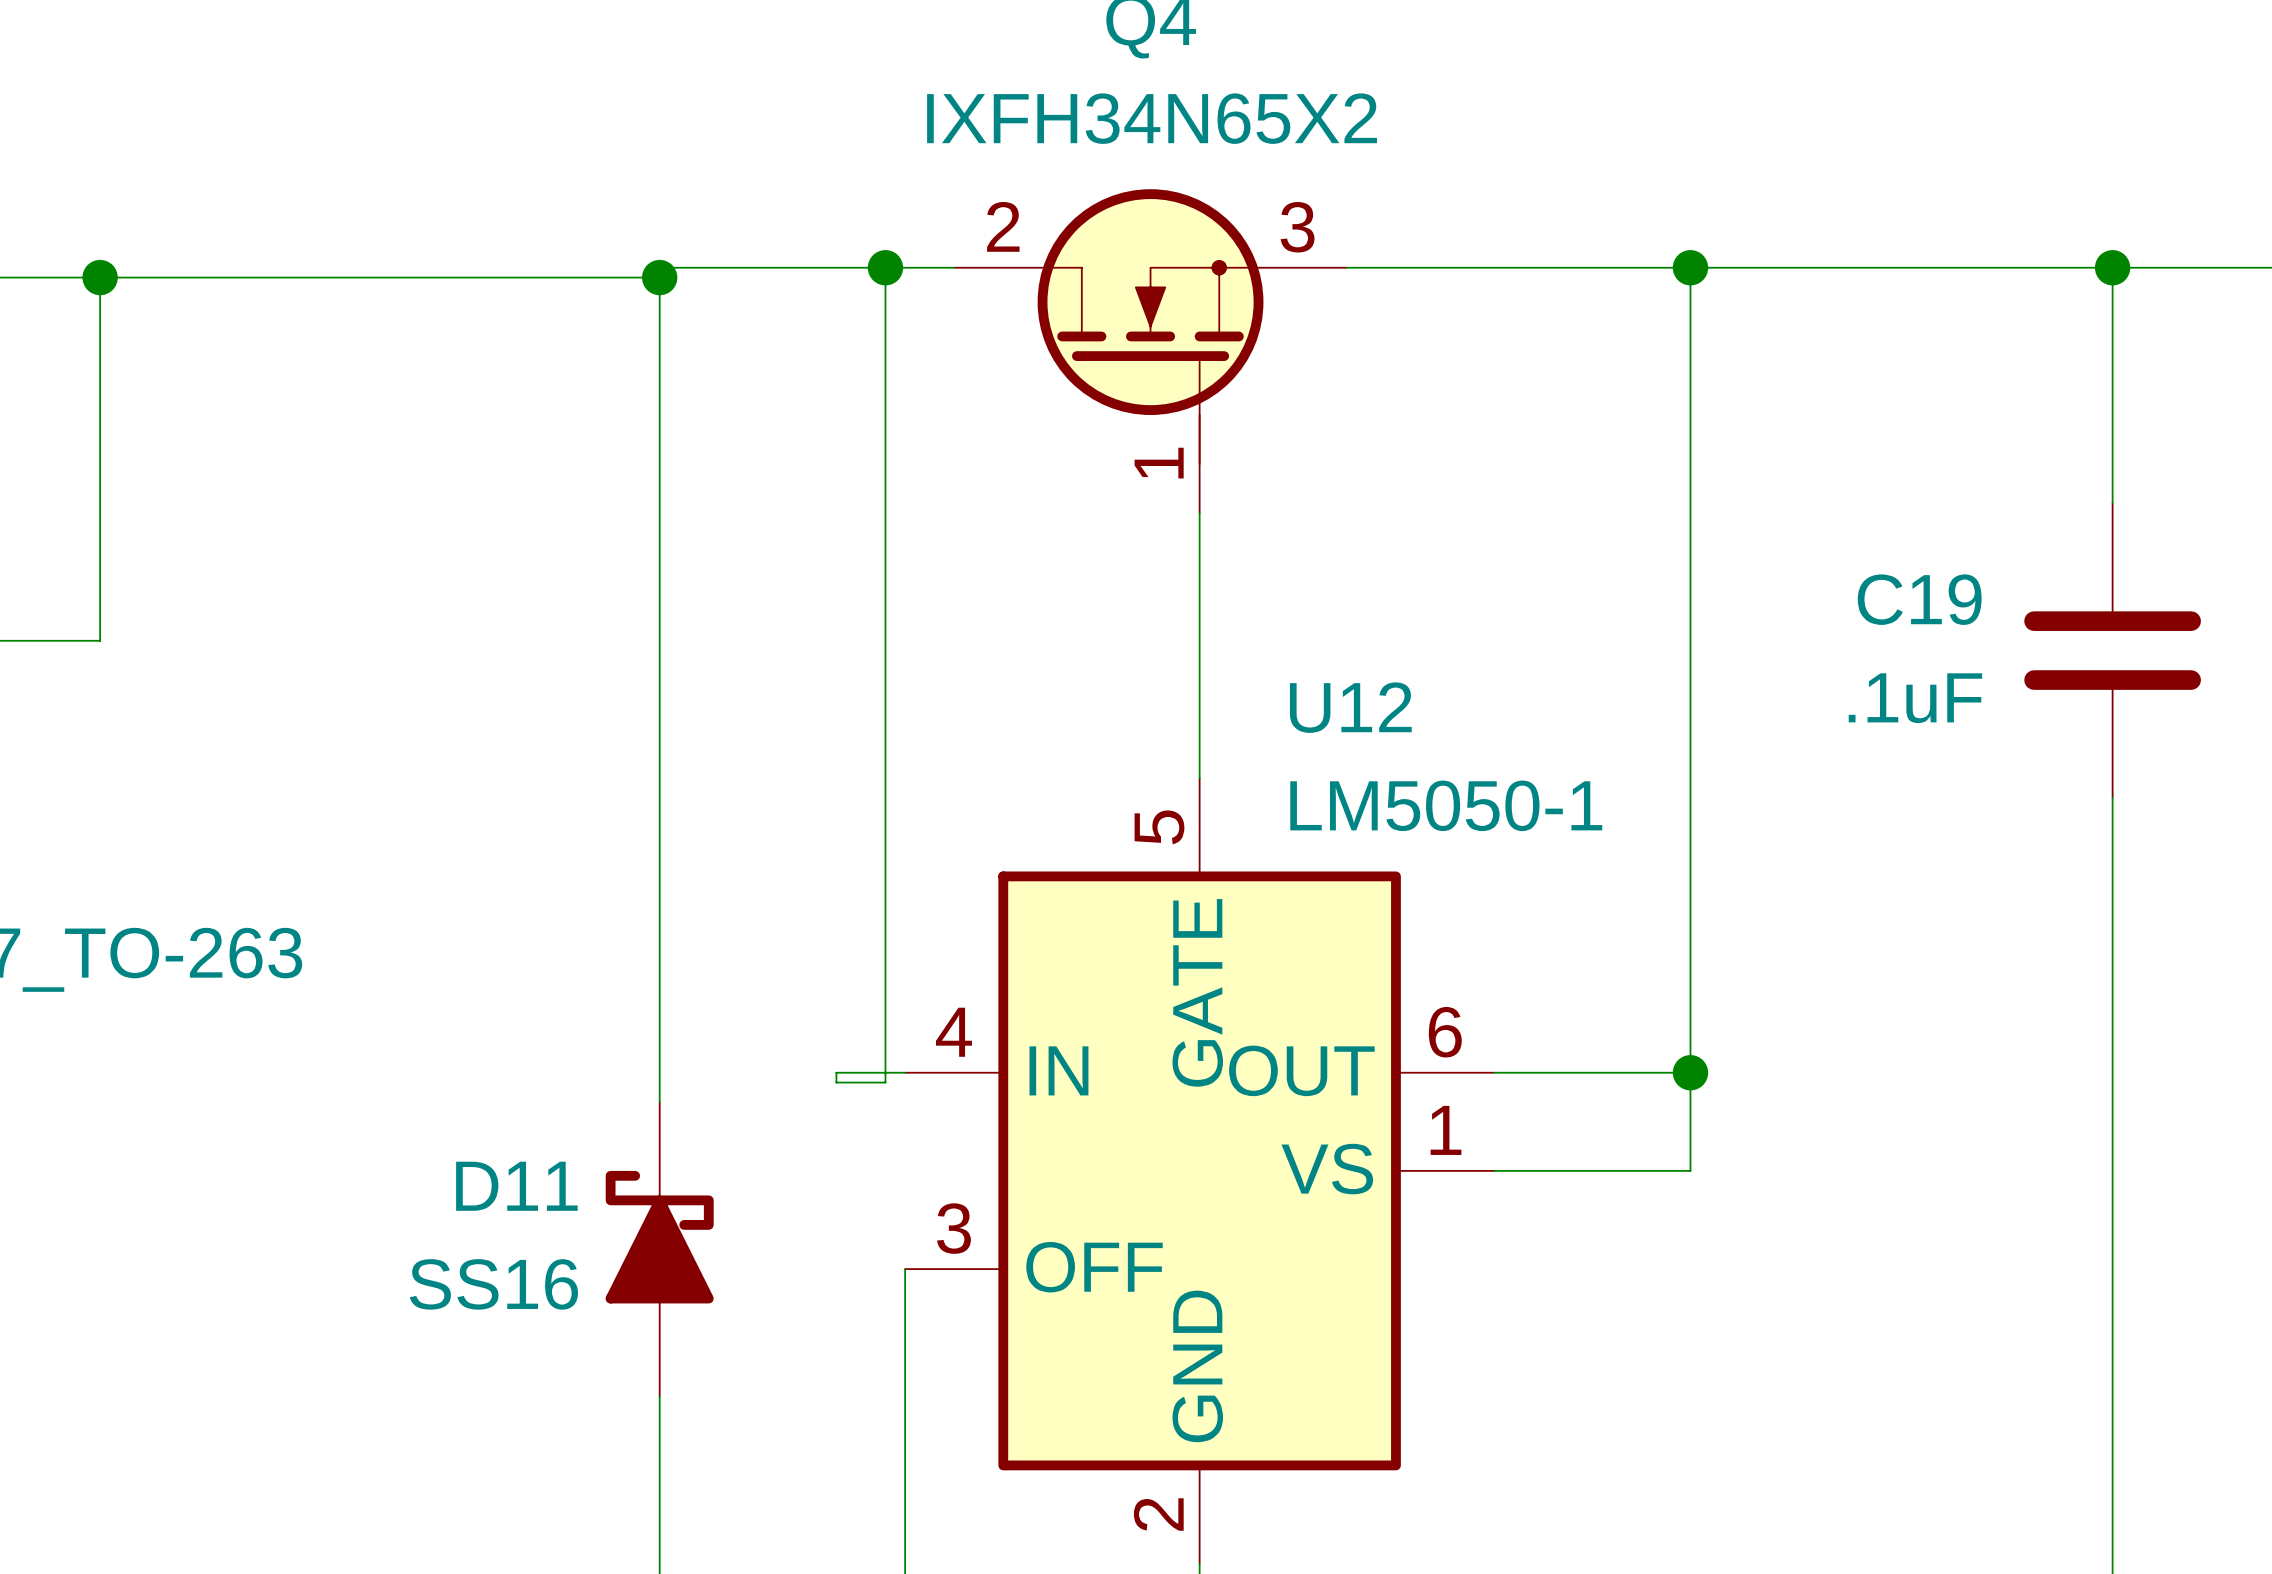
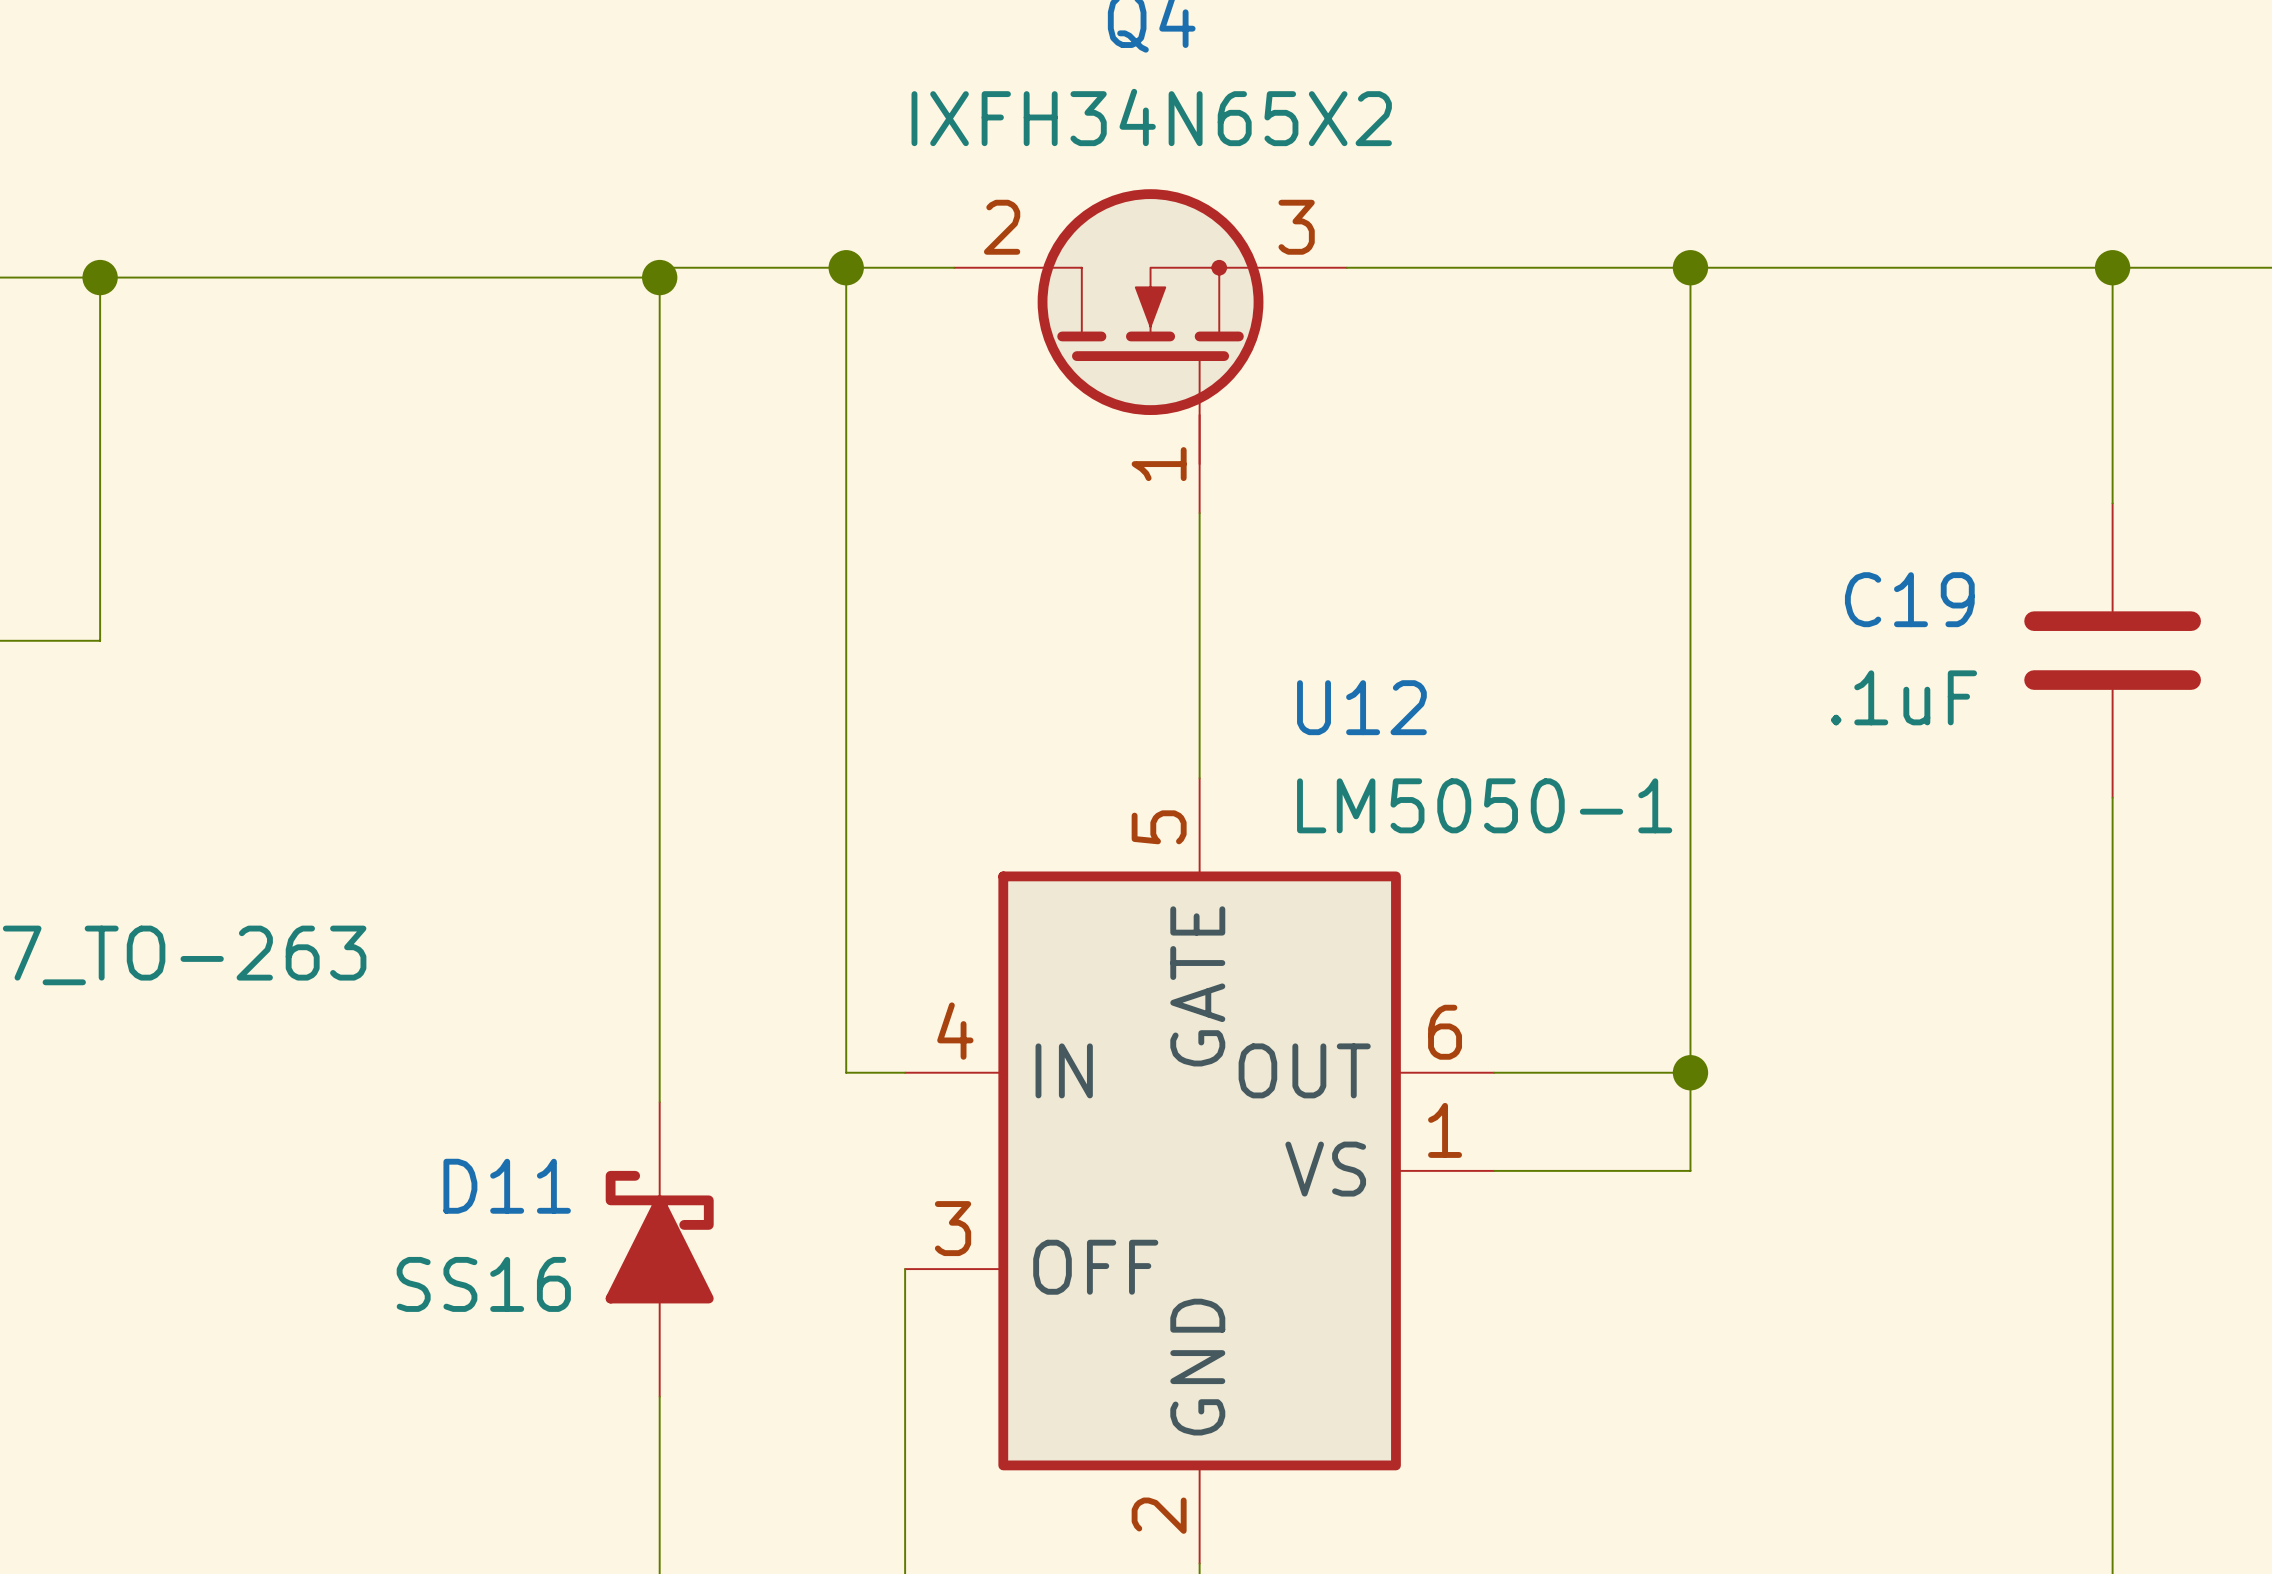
wire: (885, 267) (885, 1082) (836, 1082) (836, 1072) (846, 1072) -> (846, 267) (846, 1072)
junction position: (885, 267) -> (846, 267)

